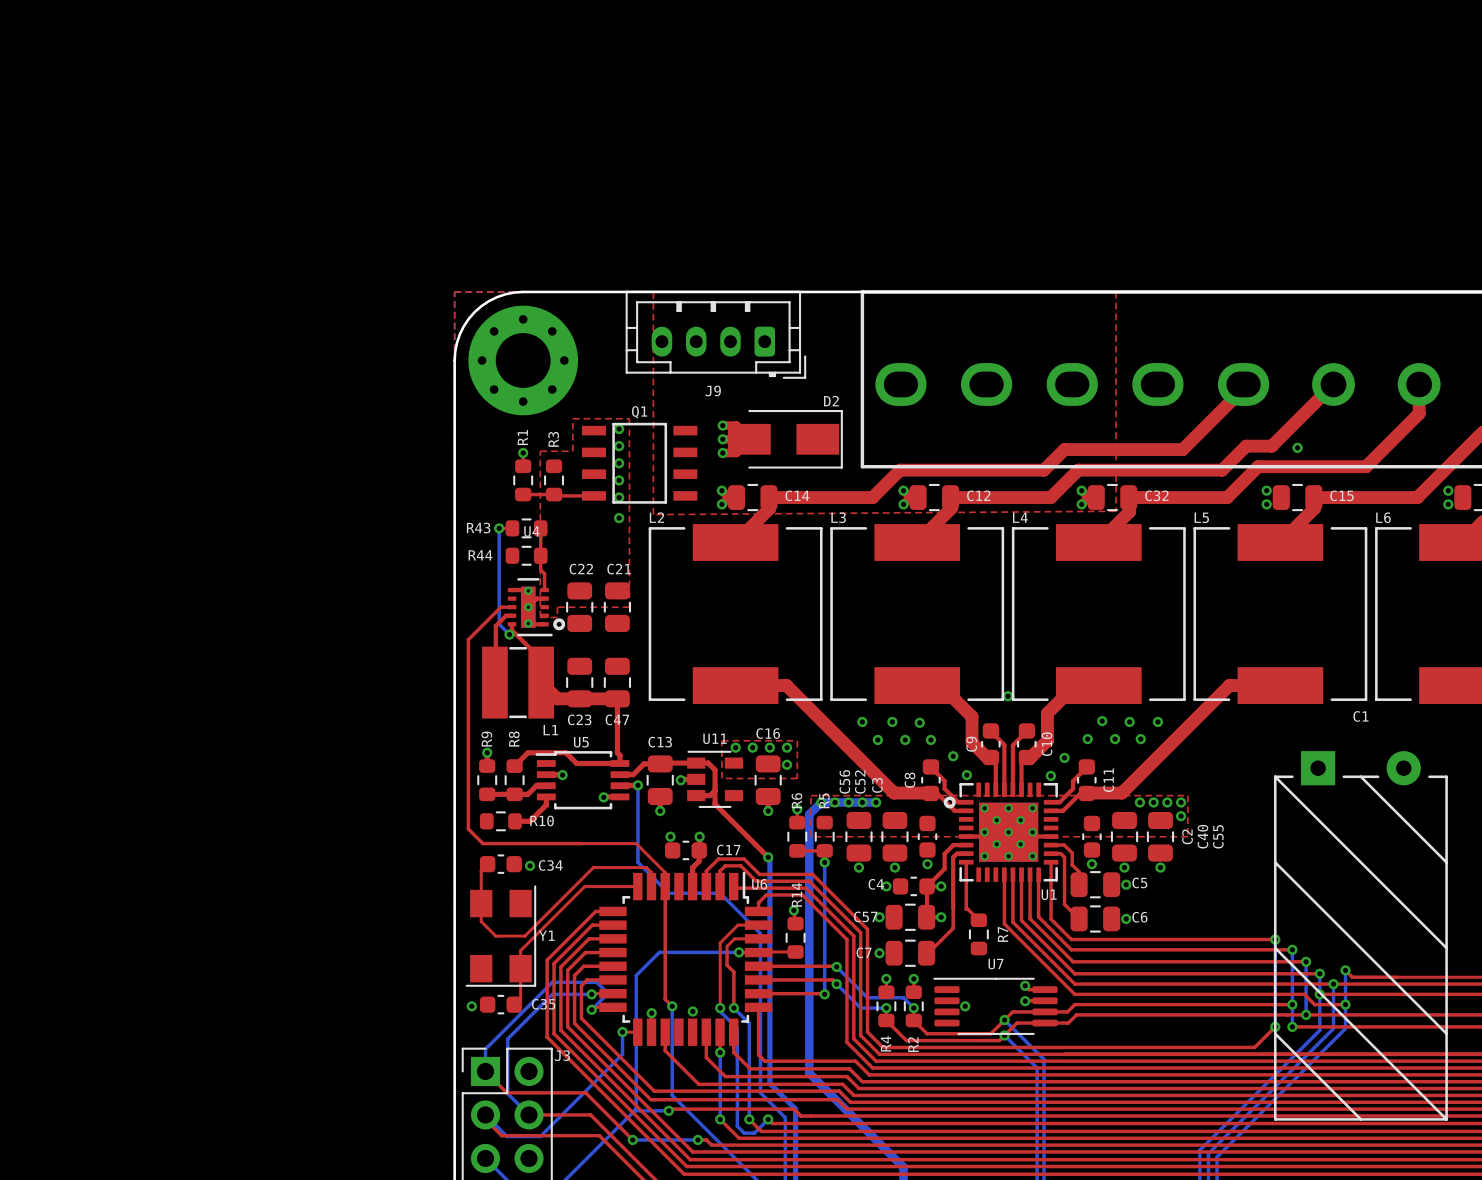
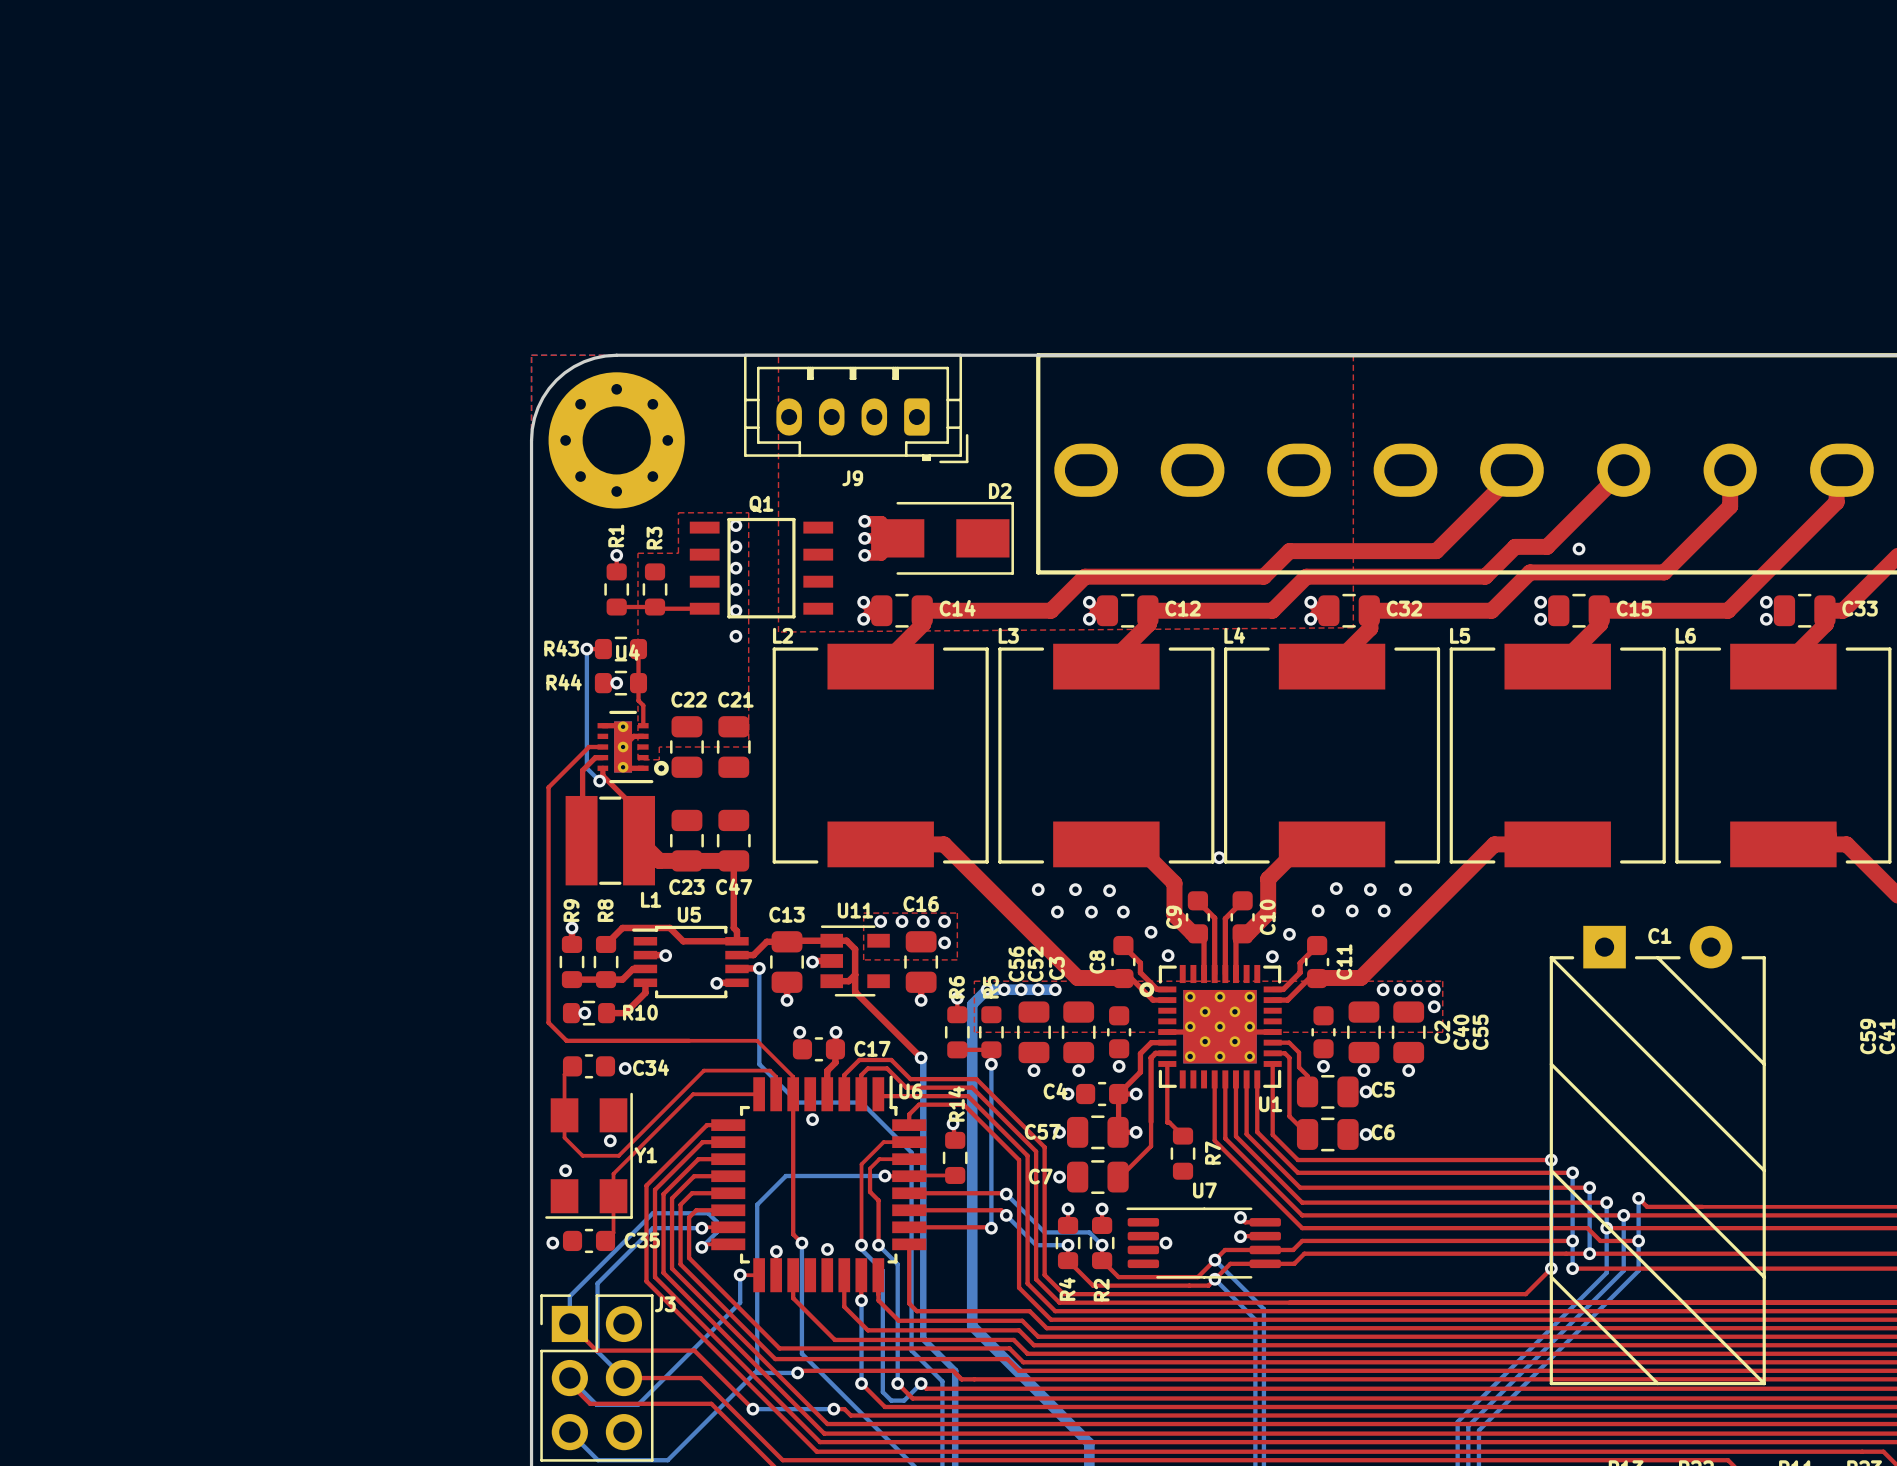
via: none -> (616, 683)
C1 name position: C1 (1360, 716) -> C1 (1659, 936)
via: none -> (584, 1013)
via: none -> (812, 1119)
via: none -> (610, 1140)
via: none -> (565, 1170)

